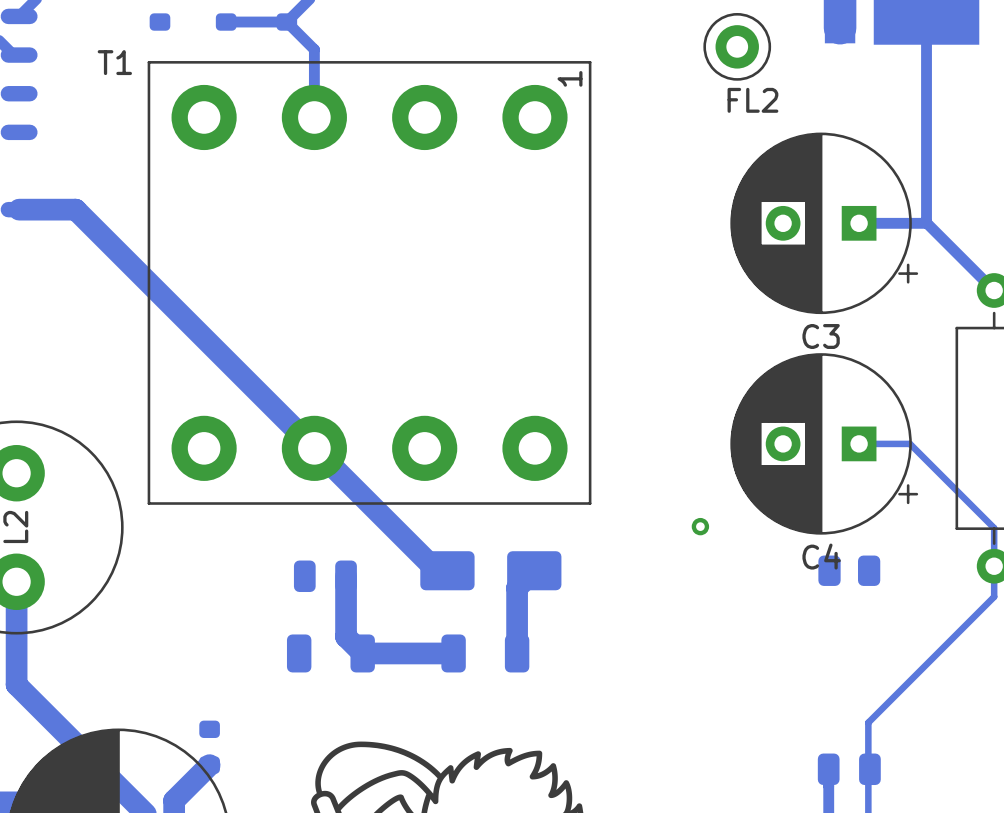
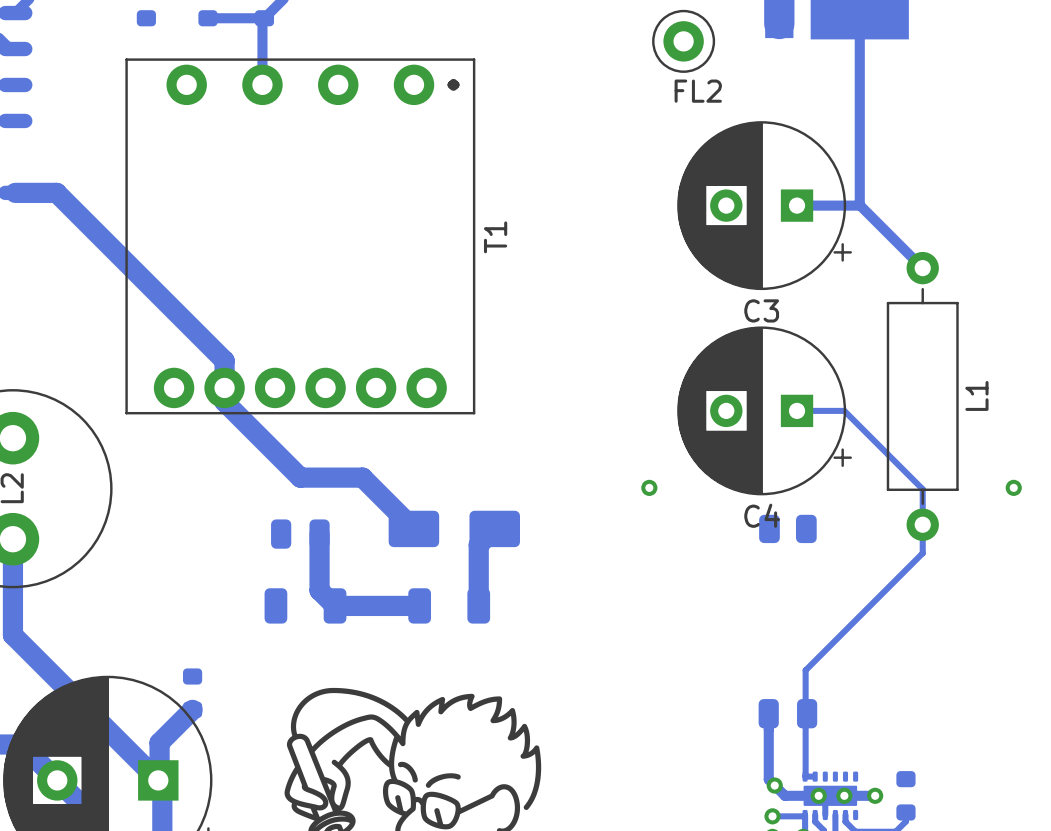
bottom track: (286, 22) (314, 49) (314, 117) -> (264, 18) (262, 20) (262, 84)
T1 footprint: [147, 61, 592, 505] -> [125, 58, 476, 415]
T1 name position: T1 (114, 62) -> T1 (495, 237)
bottom track: (63, 209) (75, 209) (436, 570) (447, 570) -> (56, 192) (224, 360) (224, 401) (300, 477) (362, 477) (413, 528)

